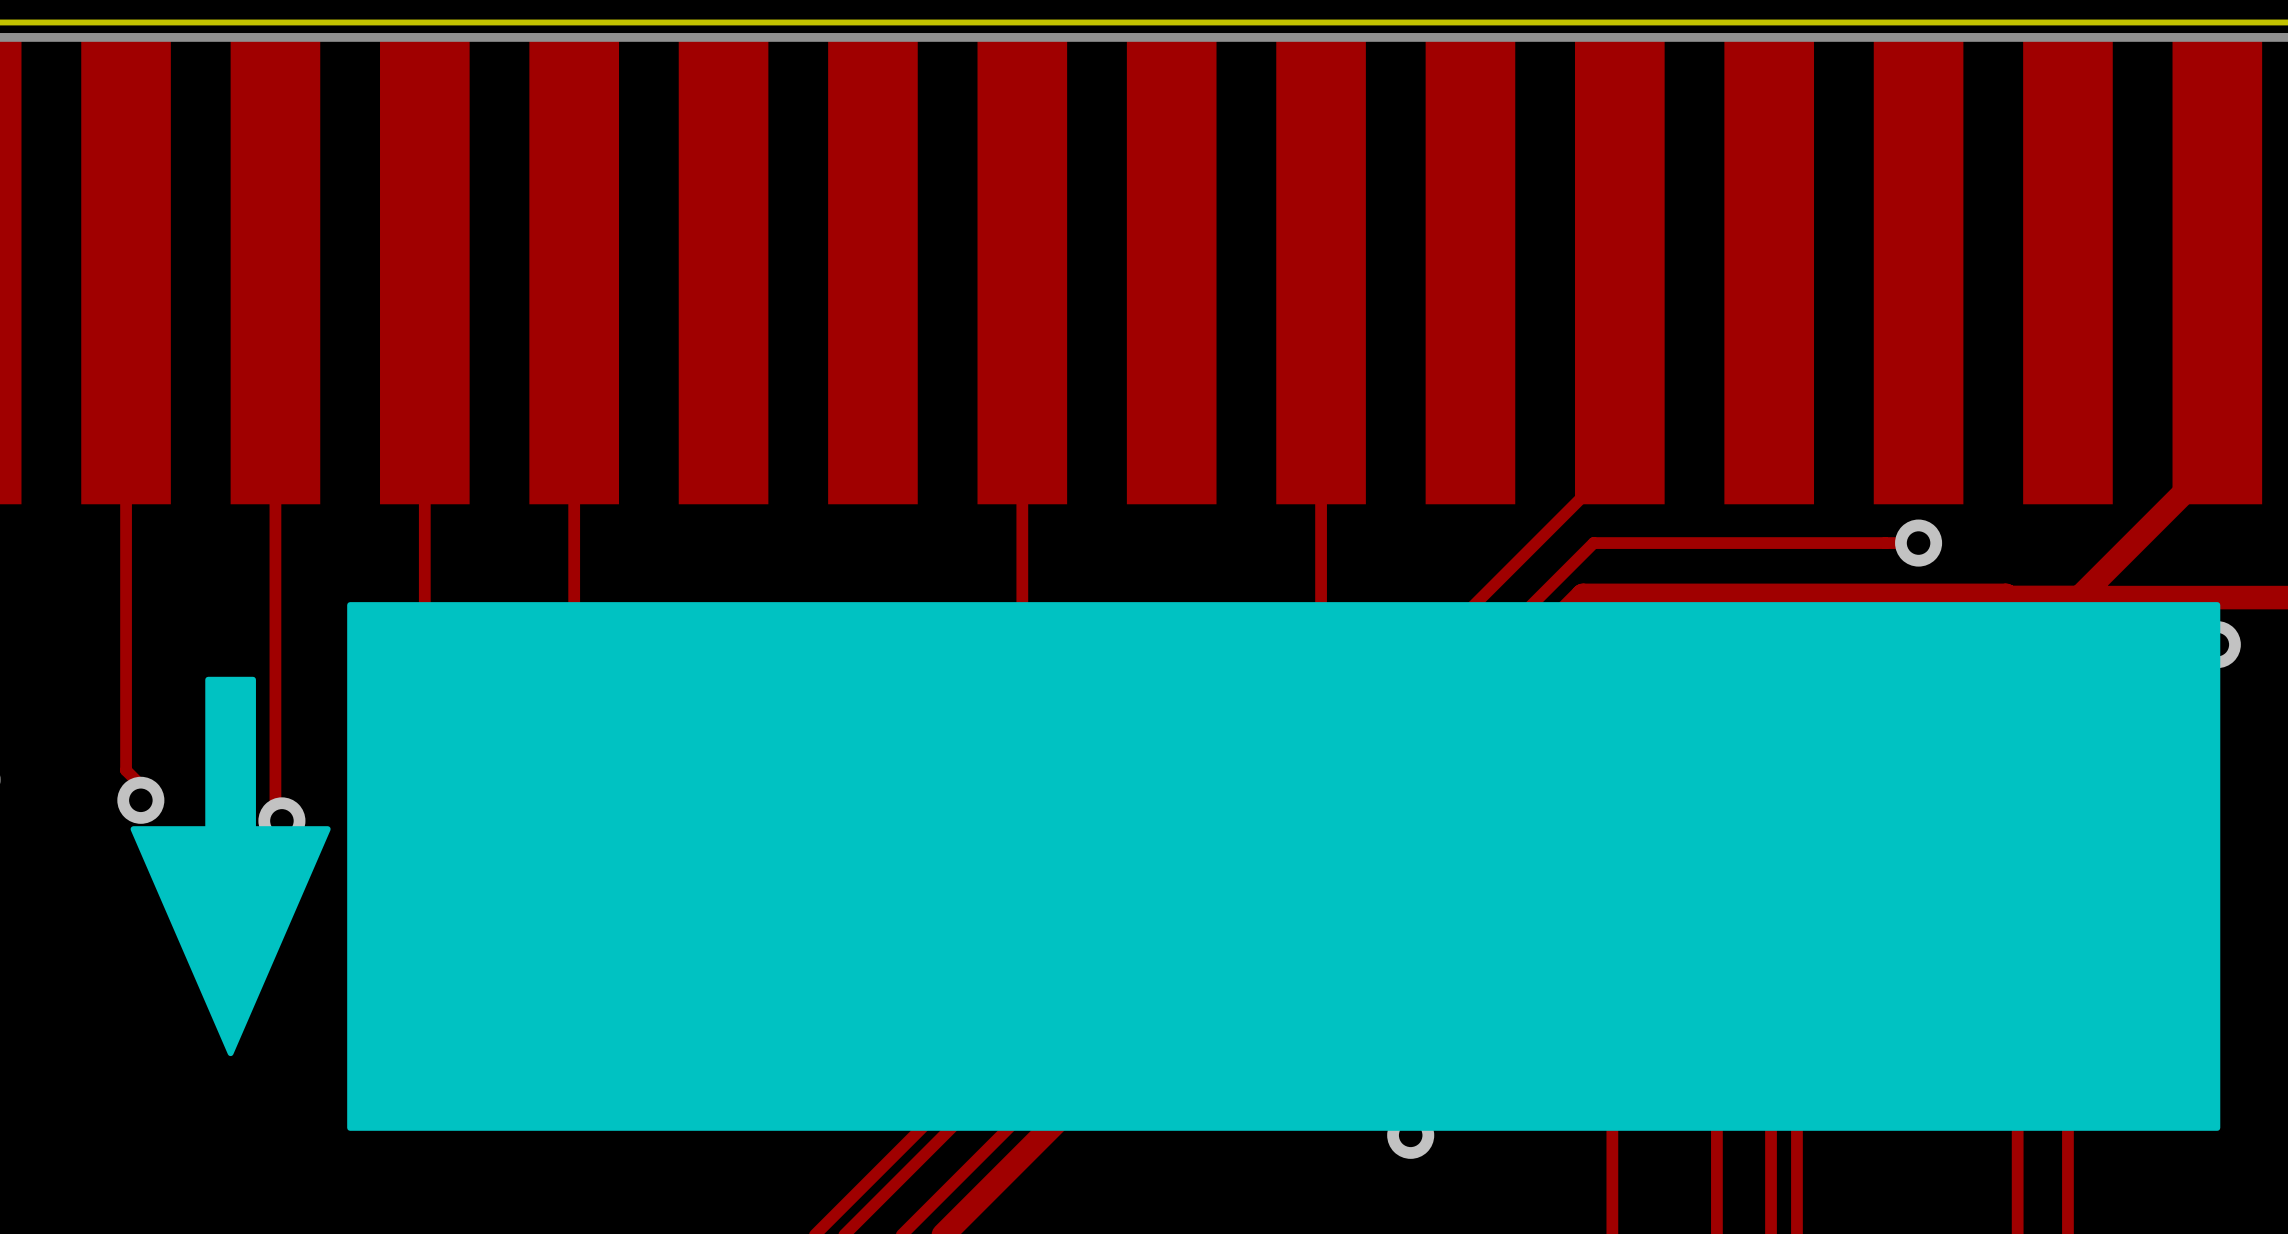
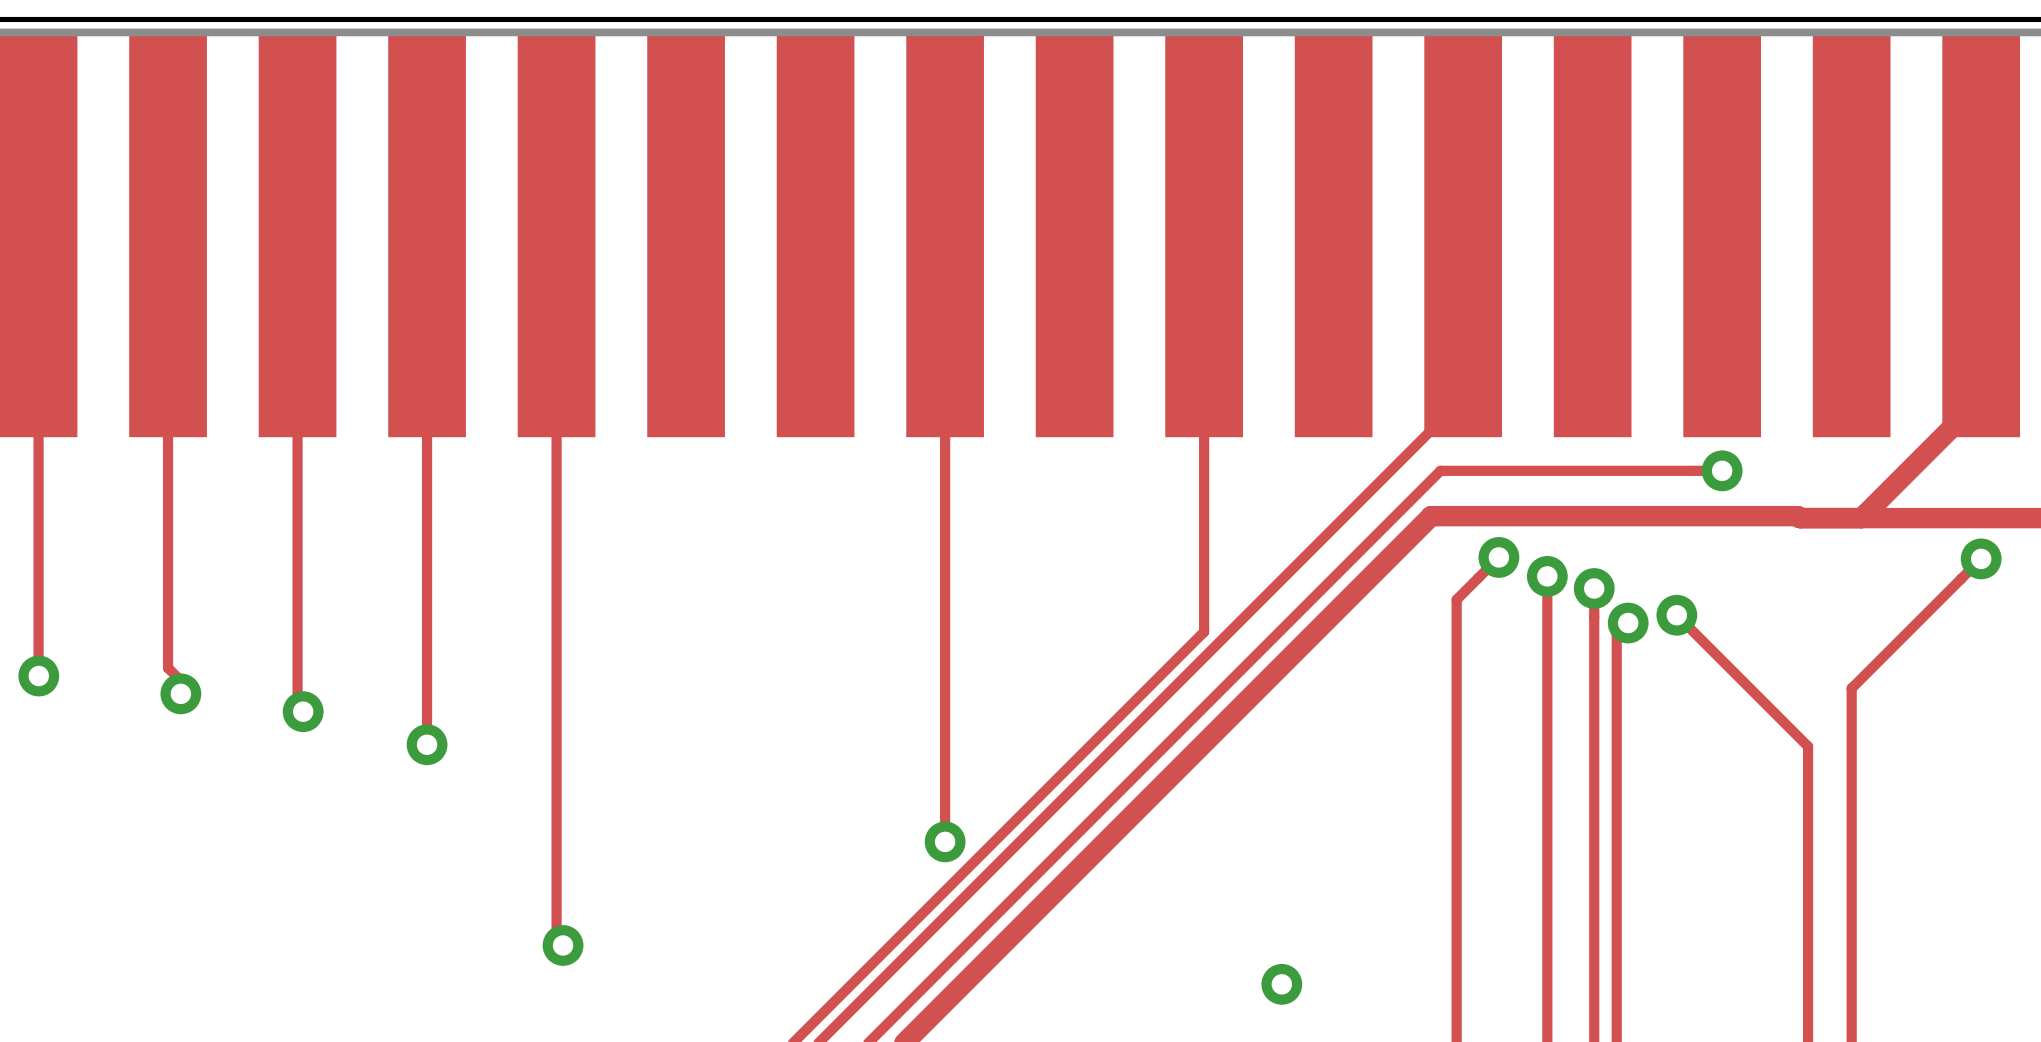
drawing: [130, 602, 2221, 1131] -> none

